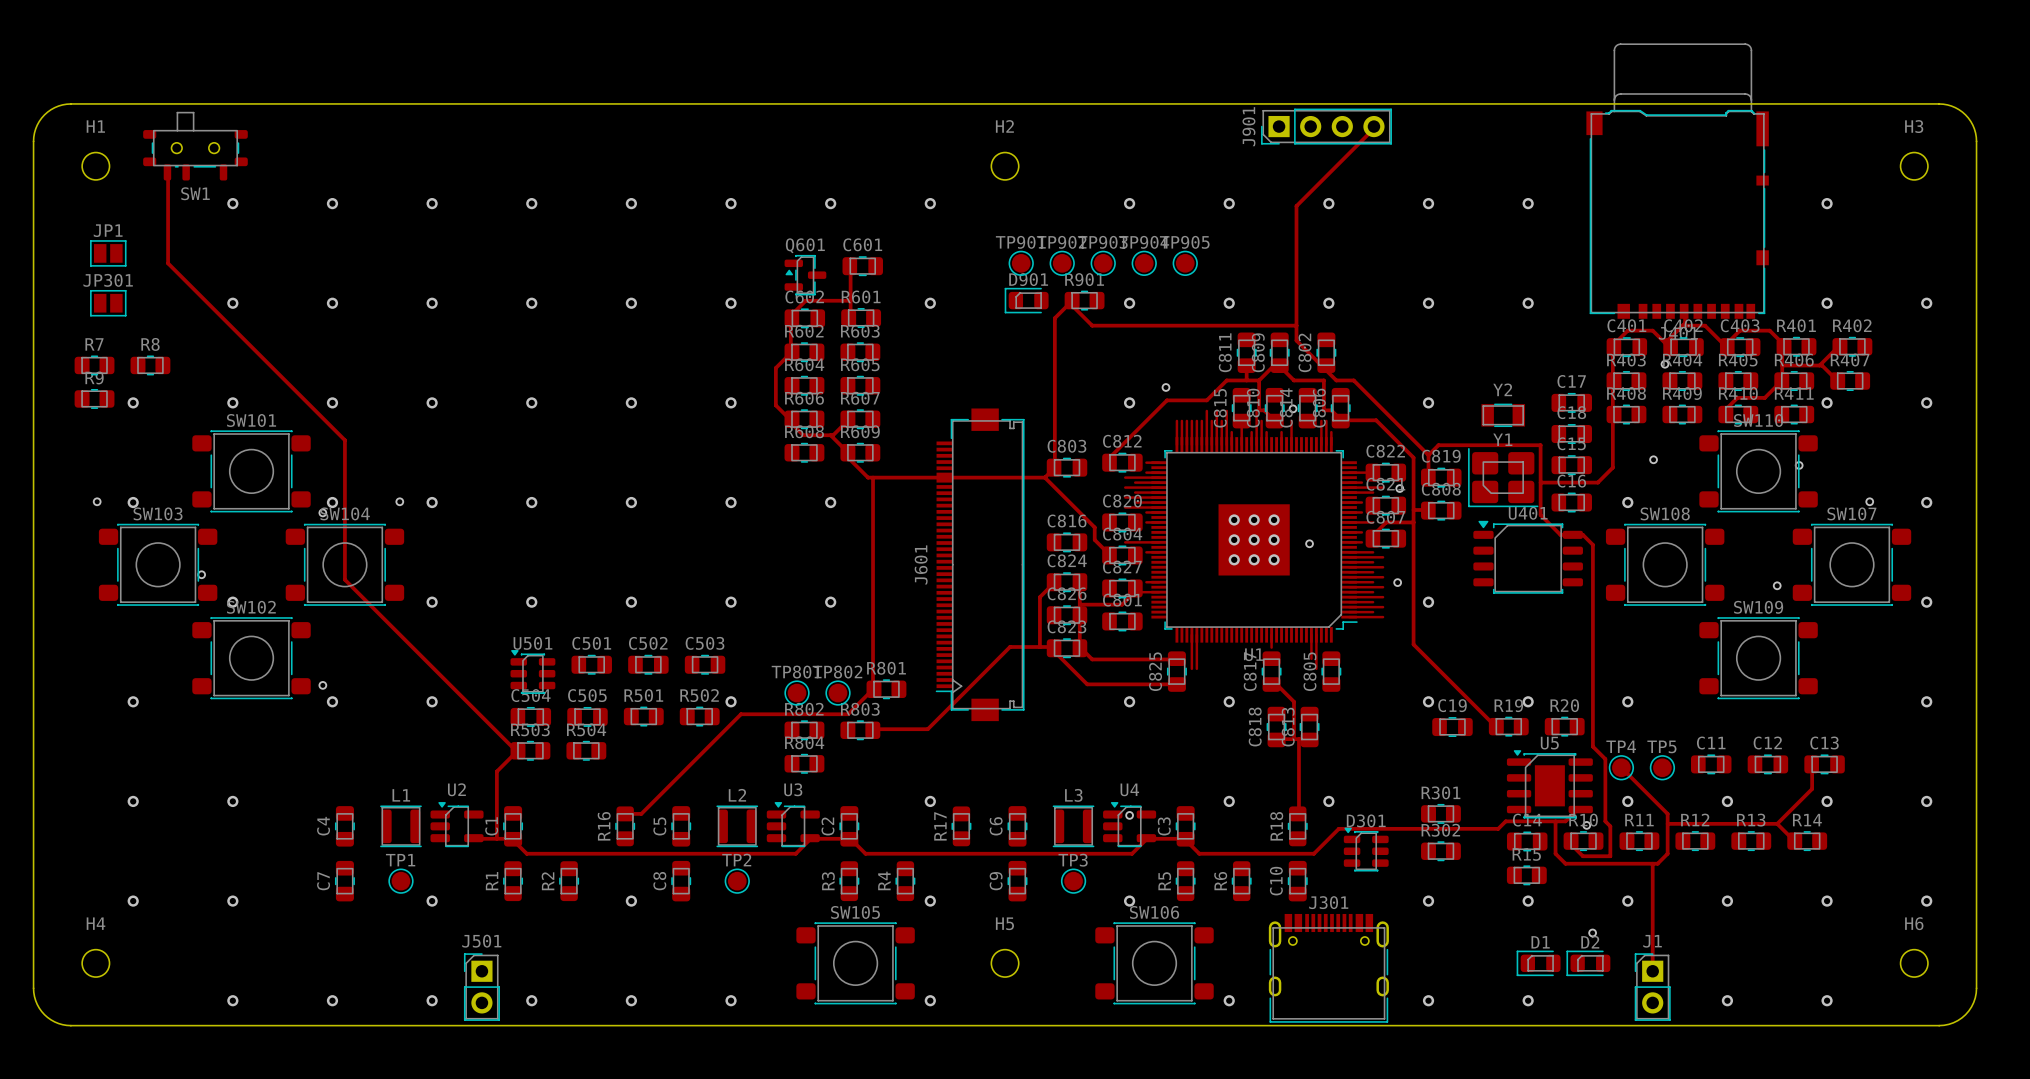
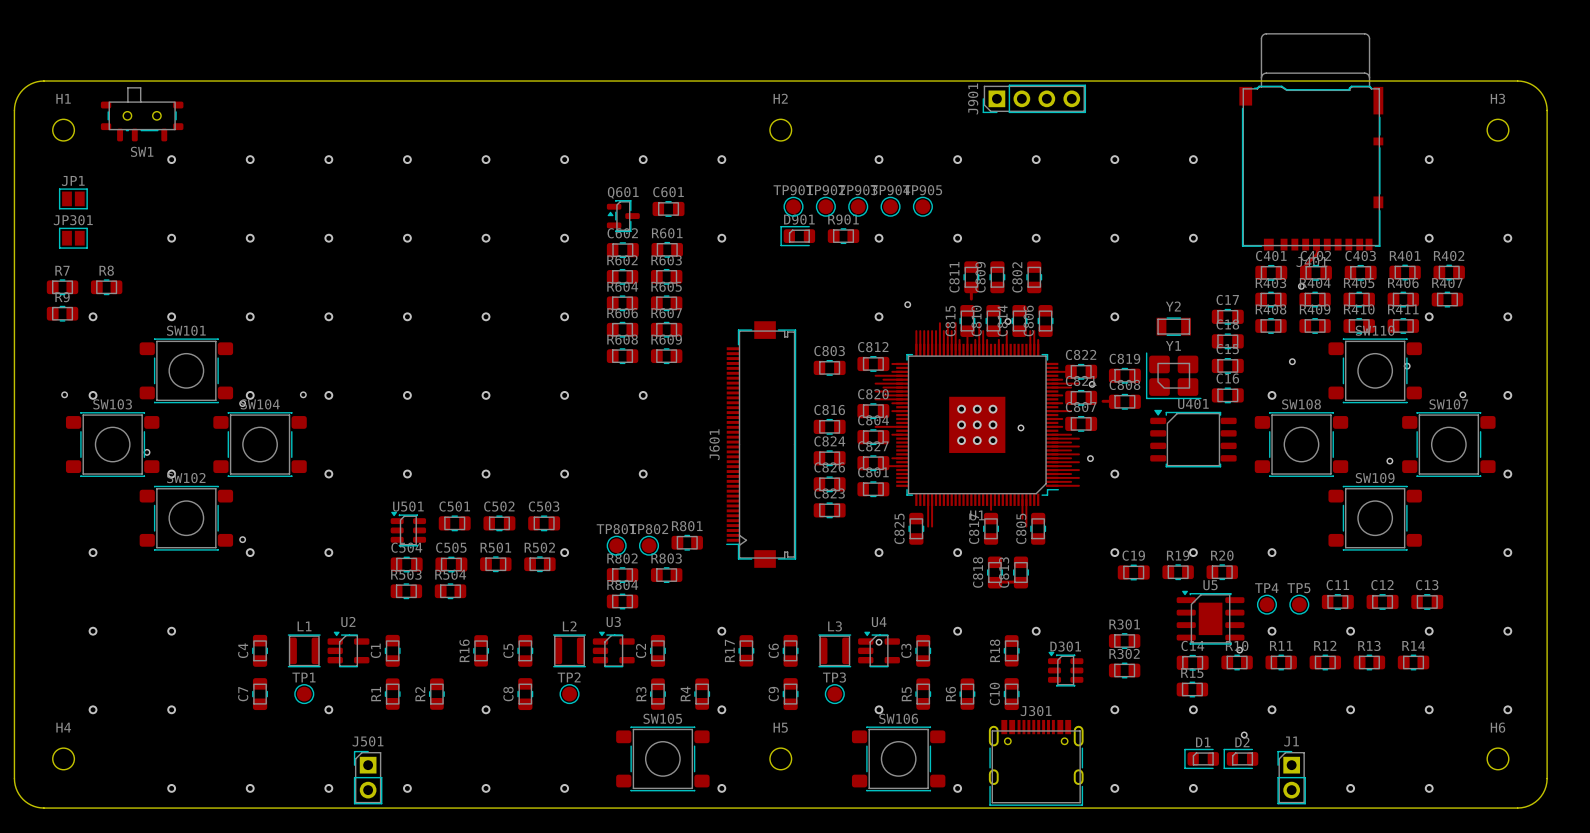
top track: (1373, 126) (1373, 128) (1296, 206) (1296, 340) (1336, 380) (1353, 380) (1428, 455) -> none
top track: (168, 171) (168, 263) (344, 440) (344, 579) (516, 751) (496, 771) (496, 838) -> none
top track: (850, 265) (850, 315) (848, 318) -> none
top track: (850, 300) (805, 300) (790, 315) (790, 353) (775, 368) (775, 405) (803, 435) (833, 435) (848, 420) -> none
top track: (1072, 300) (1054, 318) (1054, 467) (1044, 477) -> none
top track: (1069, 303) (1092, 325) (1296, 325) -> none
top track: (1682, 325) (1705, 325) (1727, 348) -> none
top track: (1782, 343) (1782, 380) (1764, 397) (1737, 397) (1724, 410) (1724, 415) -> none
top track: (1724, 345) (1739, 330) (1769, 330) (1784, 345) -> none
top track: (1839, 345) (1819, 365) -> none
top track: (1670, 348) (1652, 330) (1627, 330) (1612, 345) (1612, 467) (1597, 482) (1540, 482) -> none
top track: (1782, 365) (1822, 365) (1837, 380) -> none
top track: (1259, 380) (1226, 380) (1206, 400) (1166, 400) (1109, 457) (1109, 462) -> none
top track: (1259, 380) (1259, 410) (1264, 410) (1274, 420) -> none
top track: (1259, 380) (1274, 365) (1279, 365) (1294, 380) (1323, 380) (1323, 410) (1331, 410) (1341, 420) (1376, 420) (1413, 457) (1413, 644) (1495, 726) -> none
top track: (830, 435) (848, 452) (848, 457) (868, 477) (1044, 477) -> none
top track: (1428, 455) (1428, 477) -> none
top track: (1428, 455) (1438, 445) (1540, 445) (1540, 514) (1560, 534) (1582, 534) (1592, 544) (1592, 746) (1605, 759) (1605, 821) (1610, 826) (1610, 856) (1582, 856) (1570, 843) (1570, 841) -> none
top track: (873, 477) (873, 689) (848, 714) (741, 714) (641, 813) (626, 813) -> none
top track: (1044, 477) (1094, 527) (1094, 539) (1109, 554) -> none
top track: (1413, 522) (1386, 522) (1373, 534) (1373, 539) -> none
top track: (1054, 582) (1039, 597) (1039, 647) -> none
top track: (1079, 582) (1079, 647) (1092, 659) (1176, 659) -> none
top track: (1134, 587) (1134, 592) (1122, 604) (1079, 604) -> none
top track: (1176, 684) (1087, 684) (1054, 651) (1054, 647) (1010, 647) (927, 729) (873, 729) -> none
top track: (1271, 684) (1276, 684) (1294, 701) (1294, 739) -> none
top track: (1298, 739) (1298, 813) -> none
top track: (1812, 764) (1812, 788) (1777, 823) -> none
top track: (1620, 766) (1667, 813) (1667, 853) (1657, 863) (1565, 863) (1555, 853) (1555, 821) -> none
top track: (1580, 808) (1577, 808) (1565, 821) (1505, 821) (1498, 828) (1338, 828) (1313, 853) (1199, 853) (1184, 838) (1147, 838) (1132, 853) (865, 853) (850, 838) (810, 838) (795, 853) (526, 853) (511, 838) (474, 838) -> none
top track: (1667, 823) (1777, 823) -> none
top track: (1777, 823) (1794, 841) -> none
top track: (1652, 863) (1652, 970) -> none

